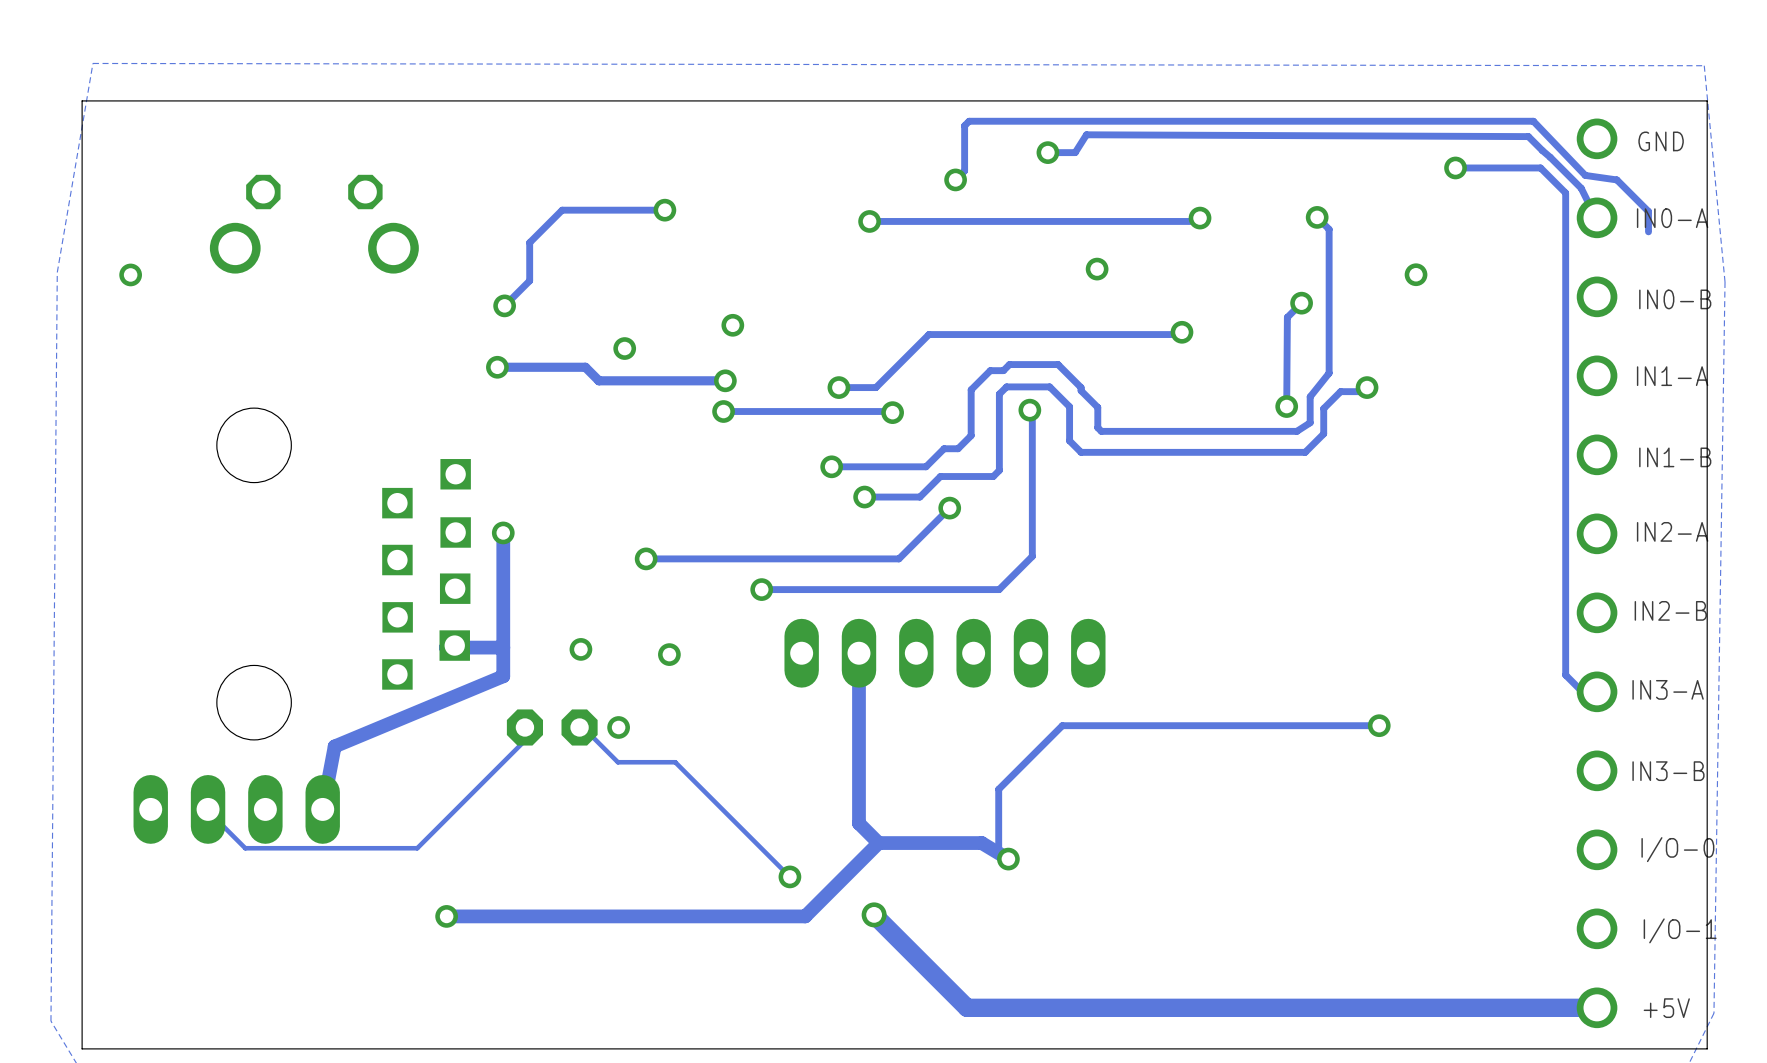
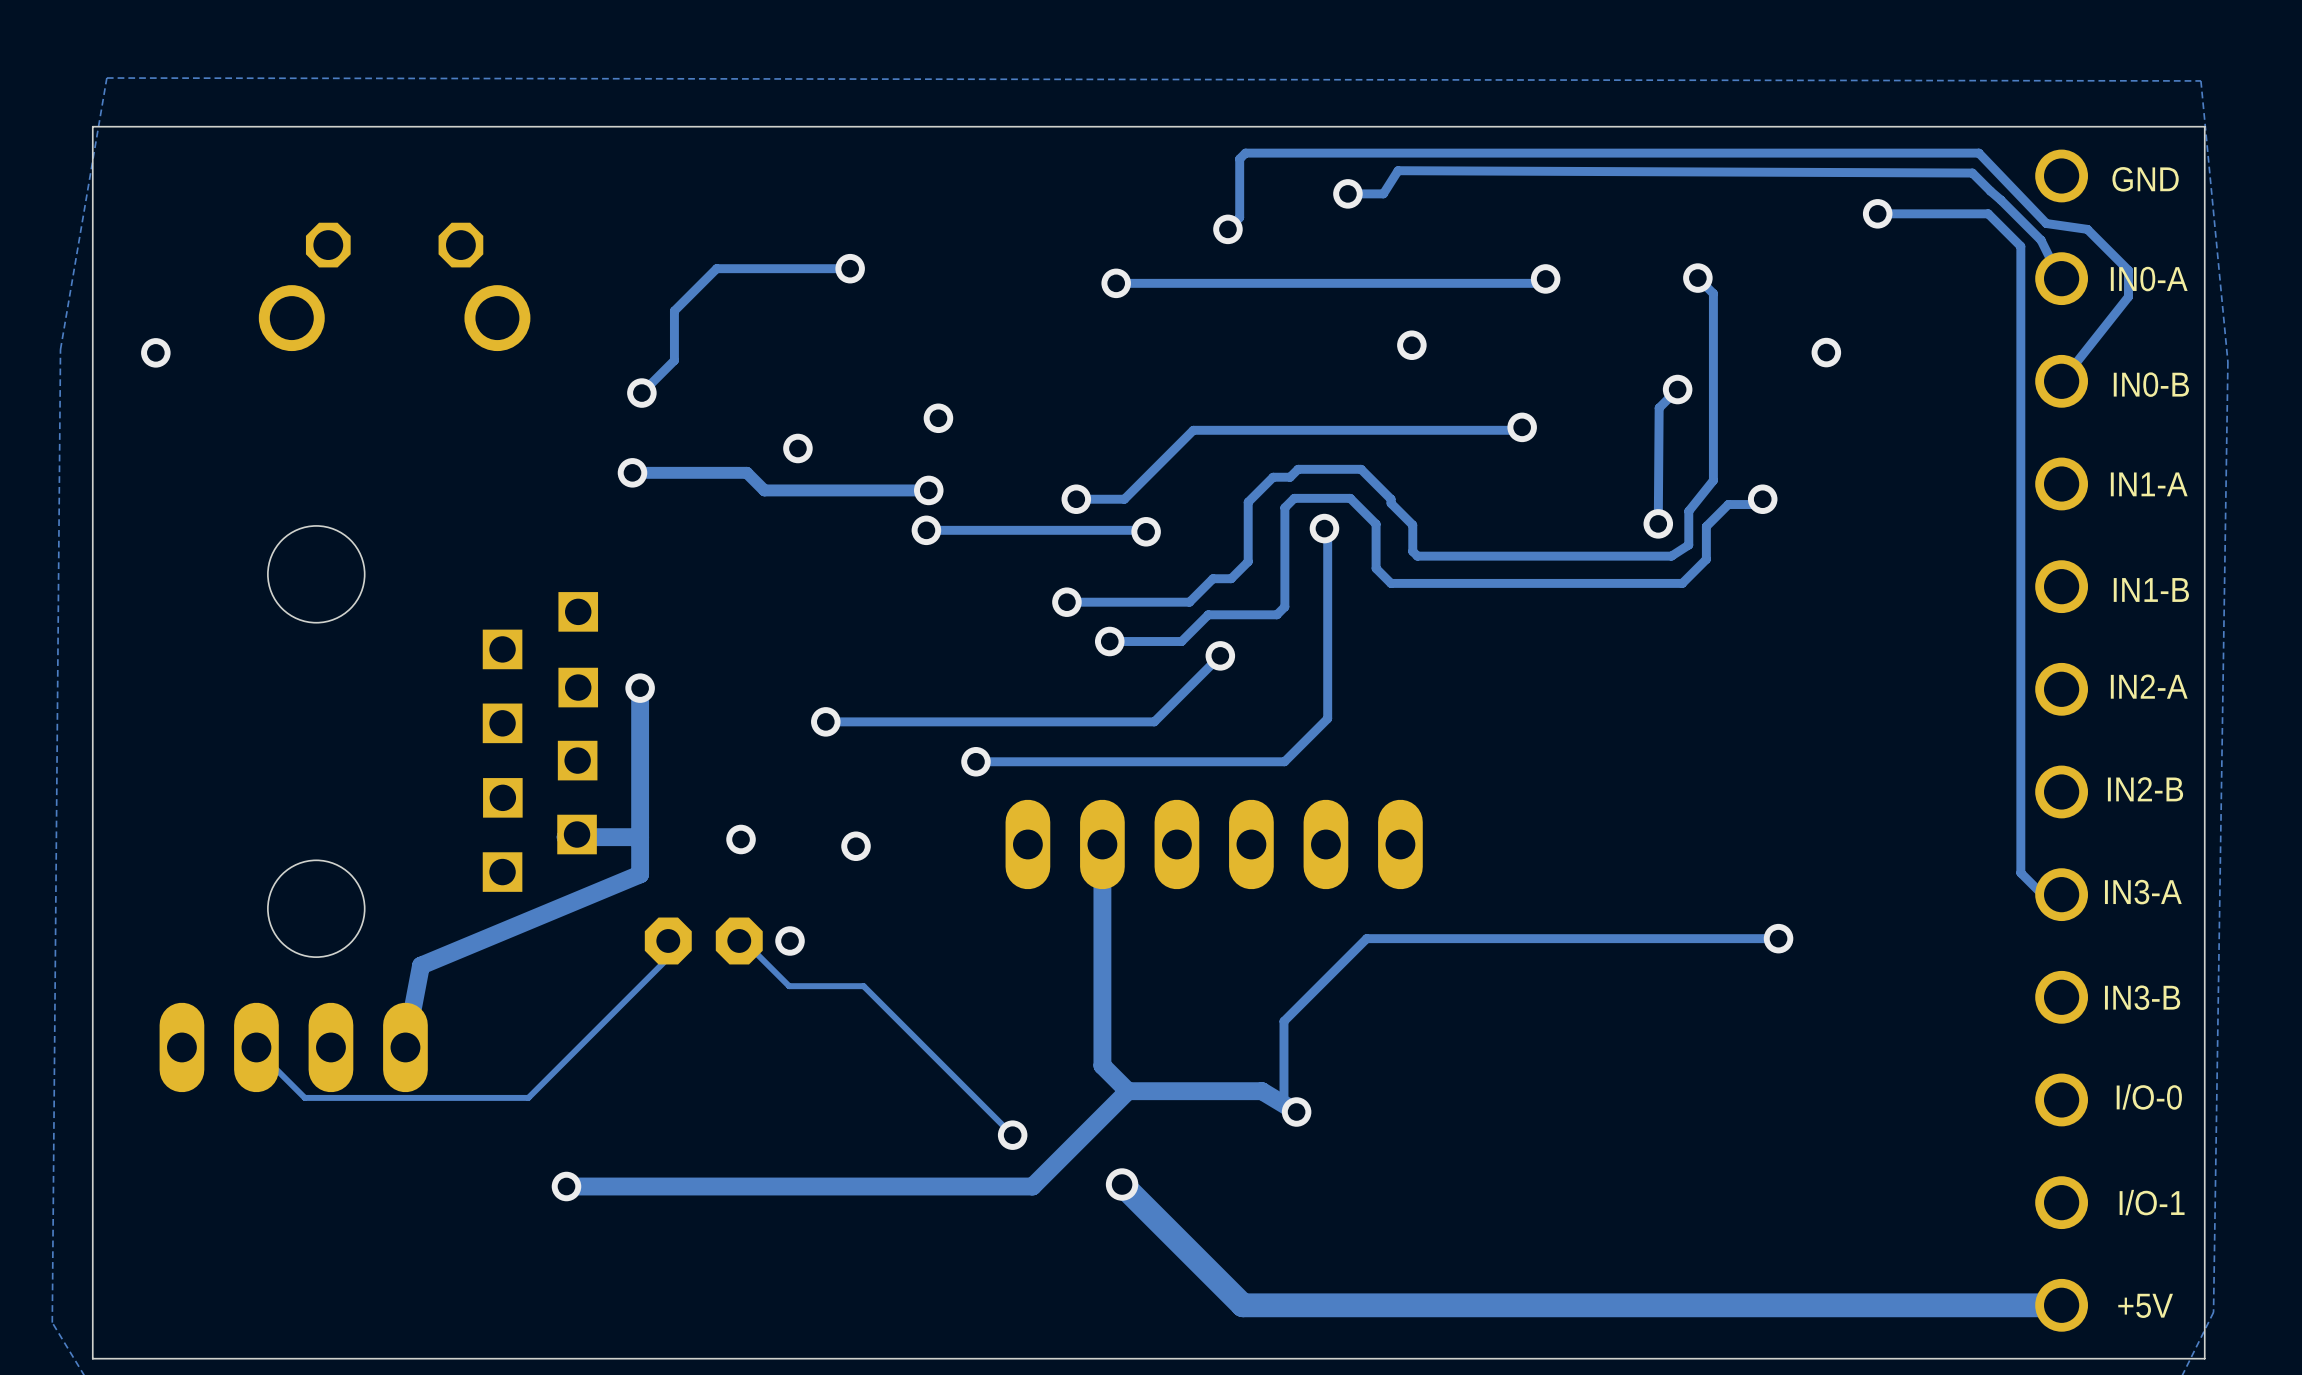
track: none -> (2128, 296) (2061, 381)

